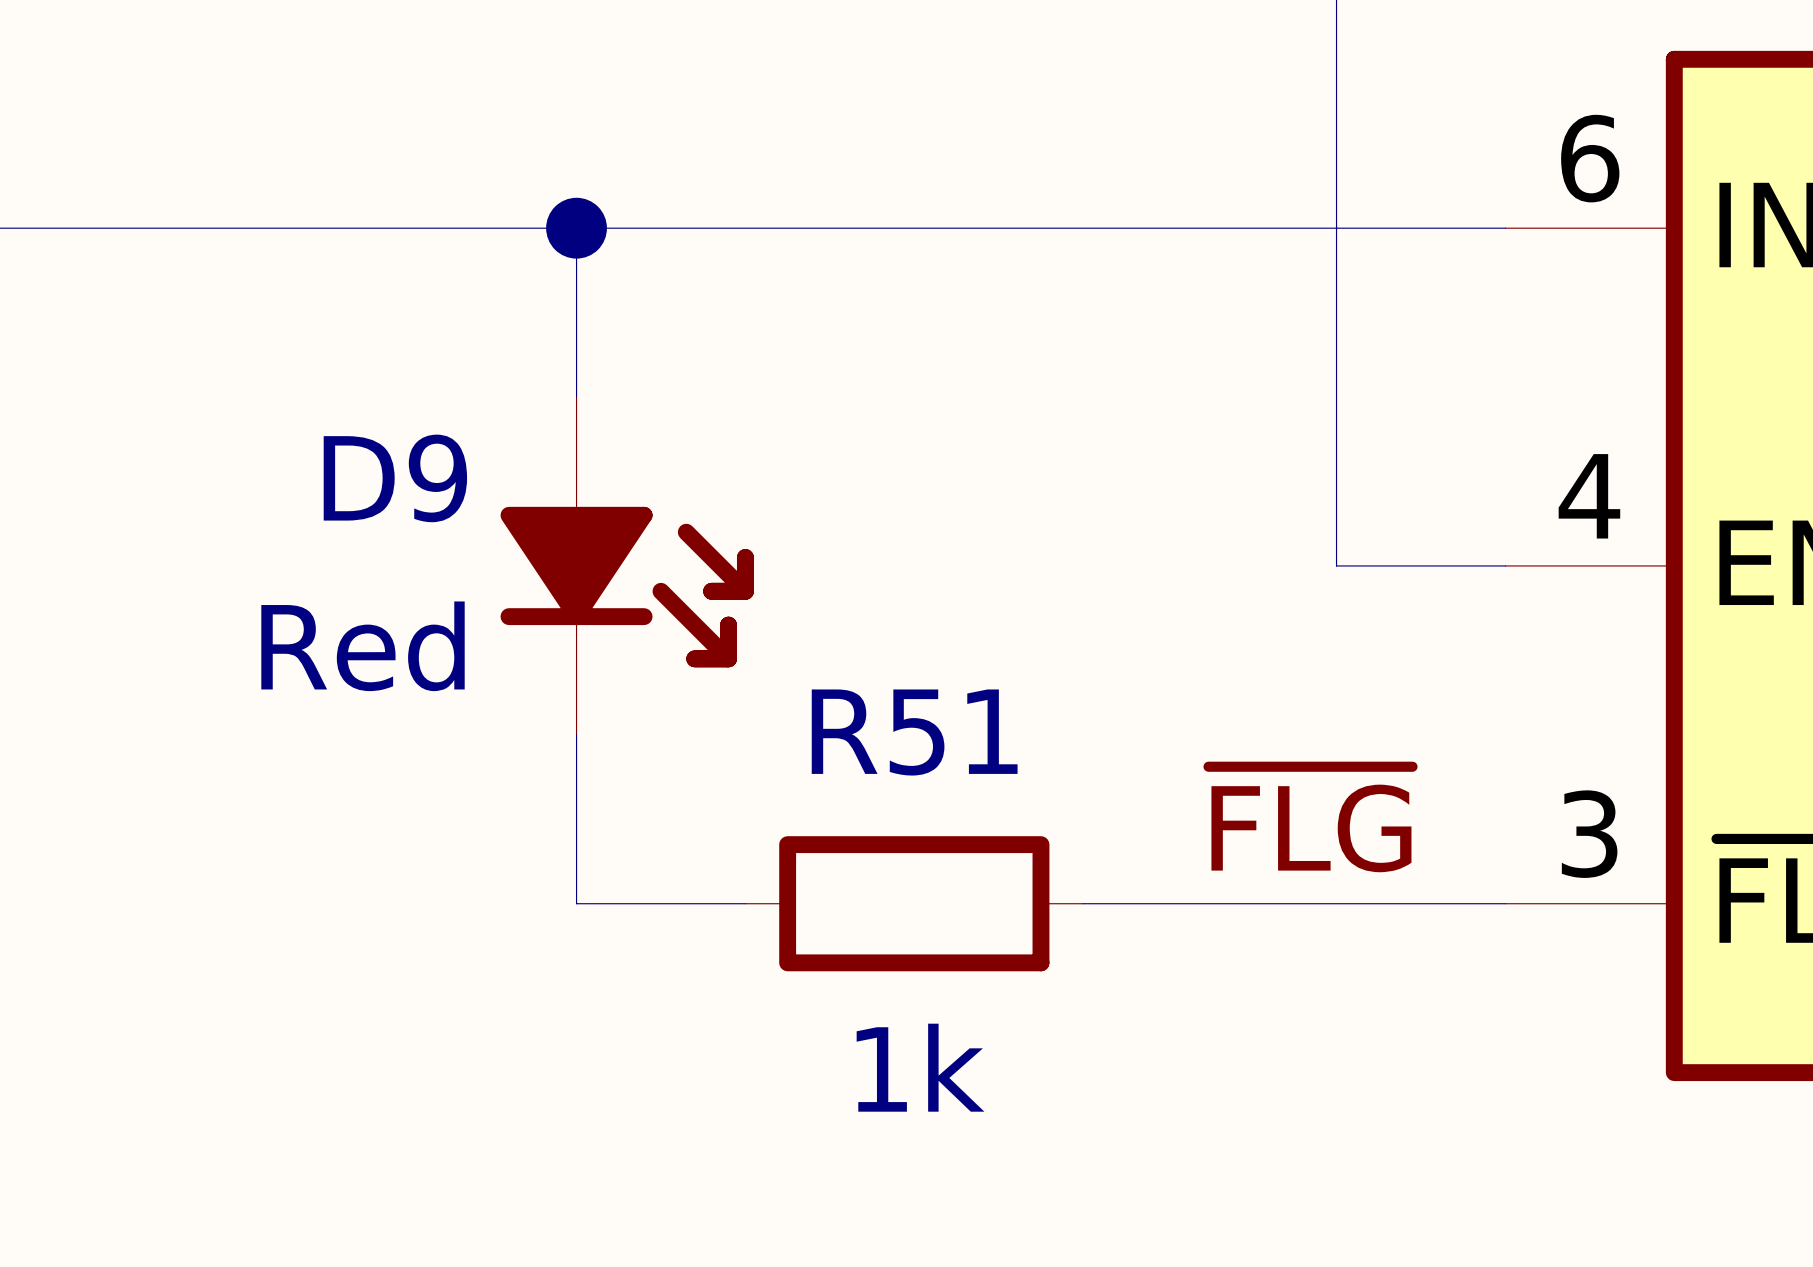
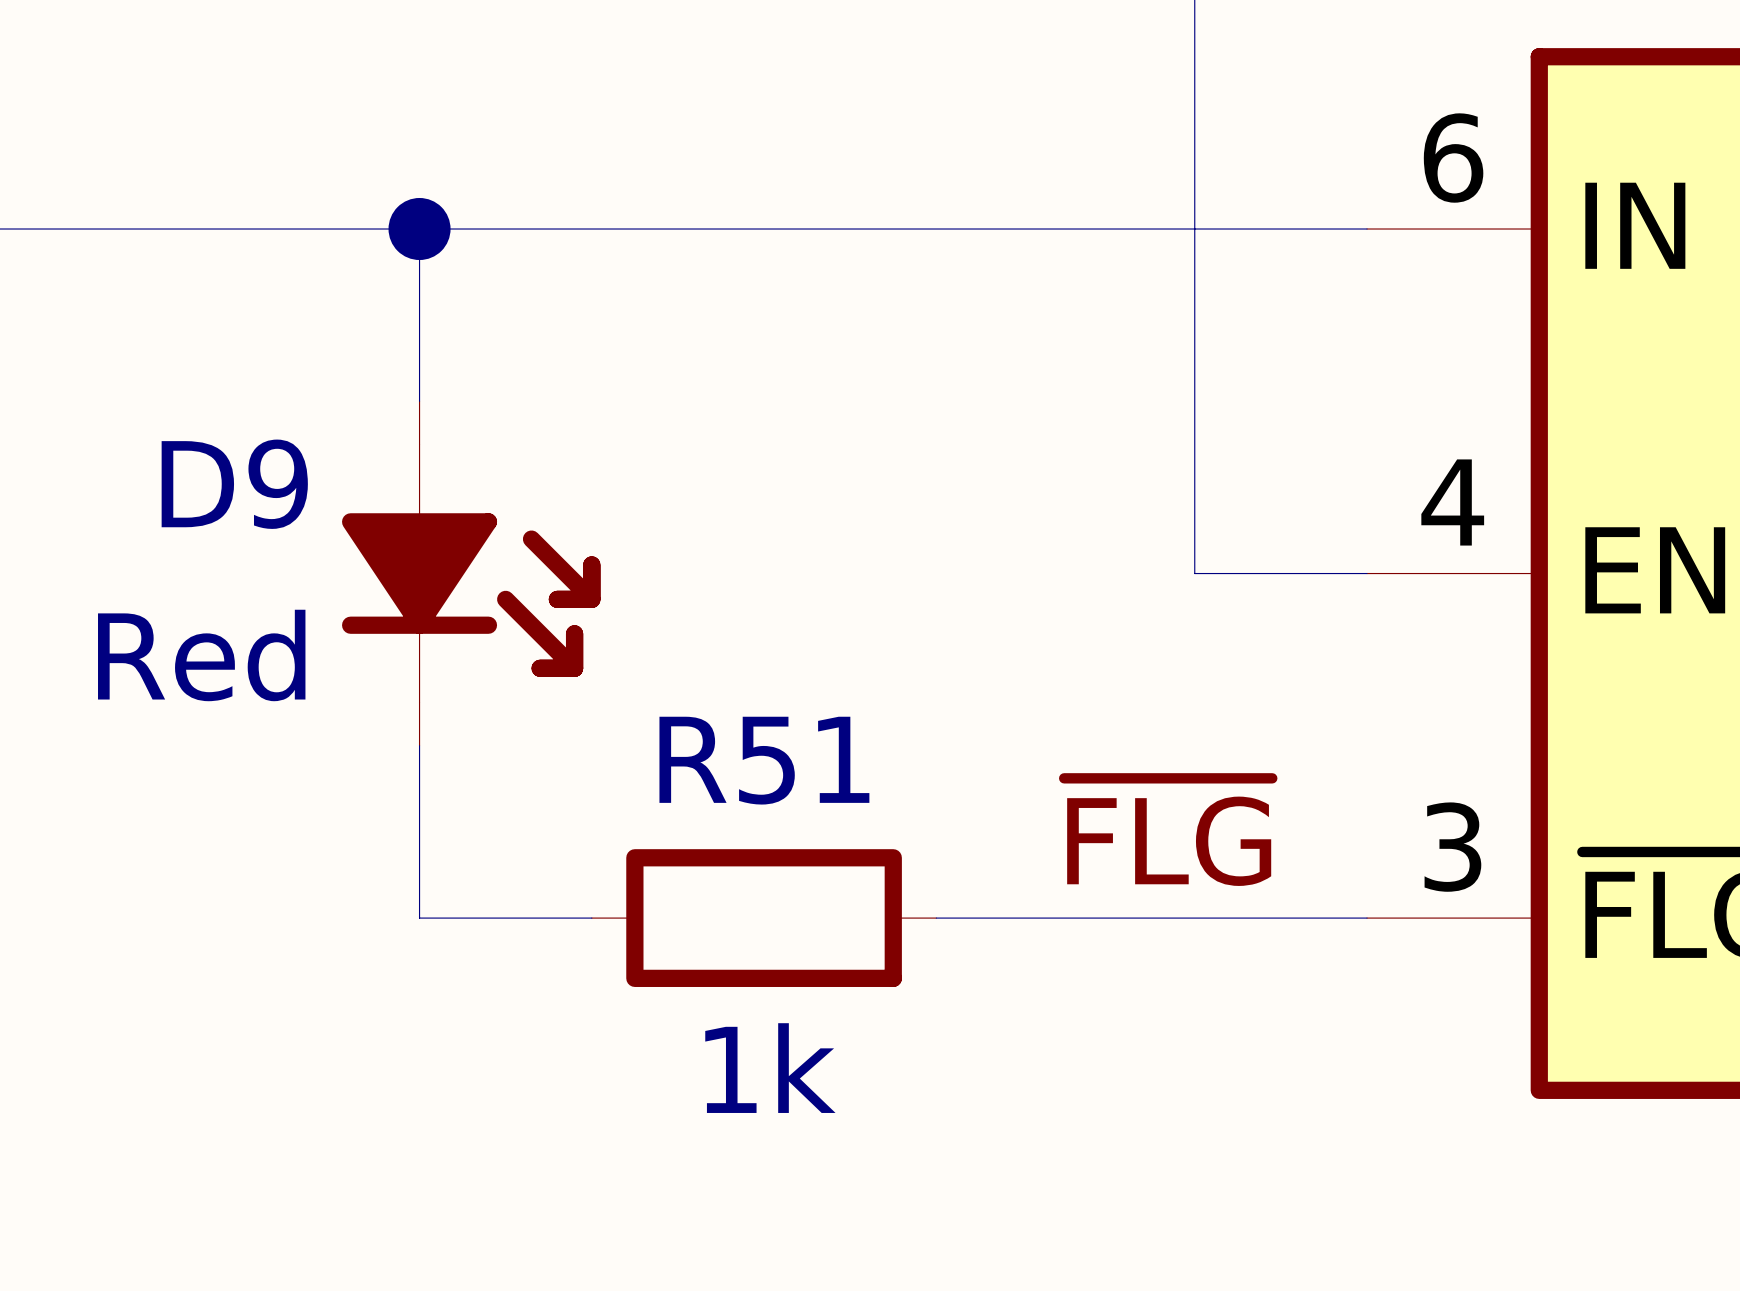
R51 name position: R51 (914, 732) -> R51 (764, 760)
R51 text position: 1k (920, 1067) -> 1k (770, 1068)

